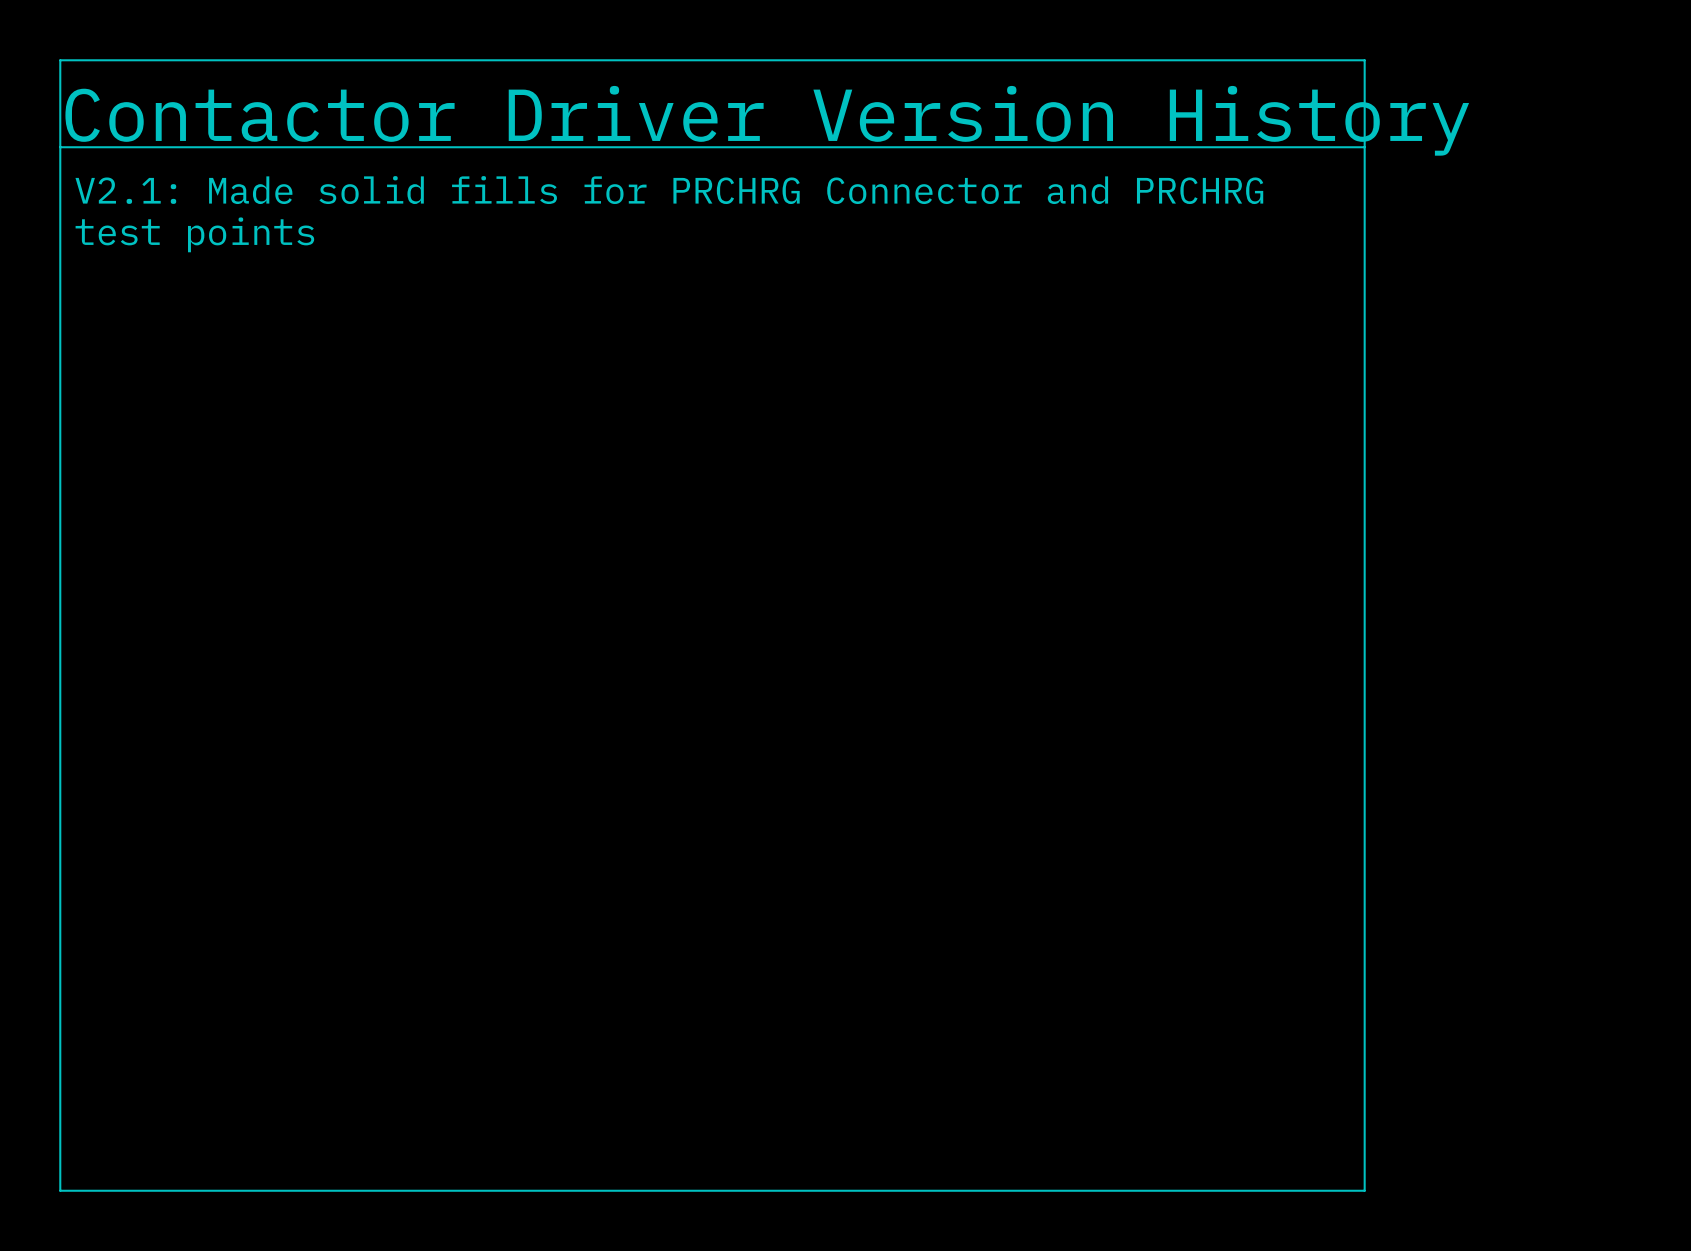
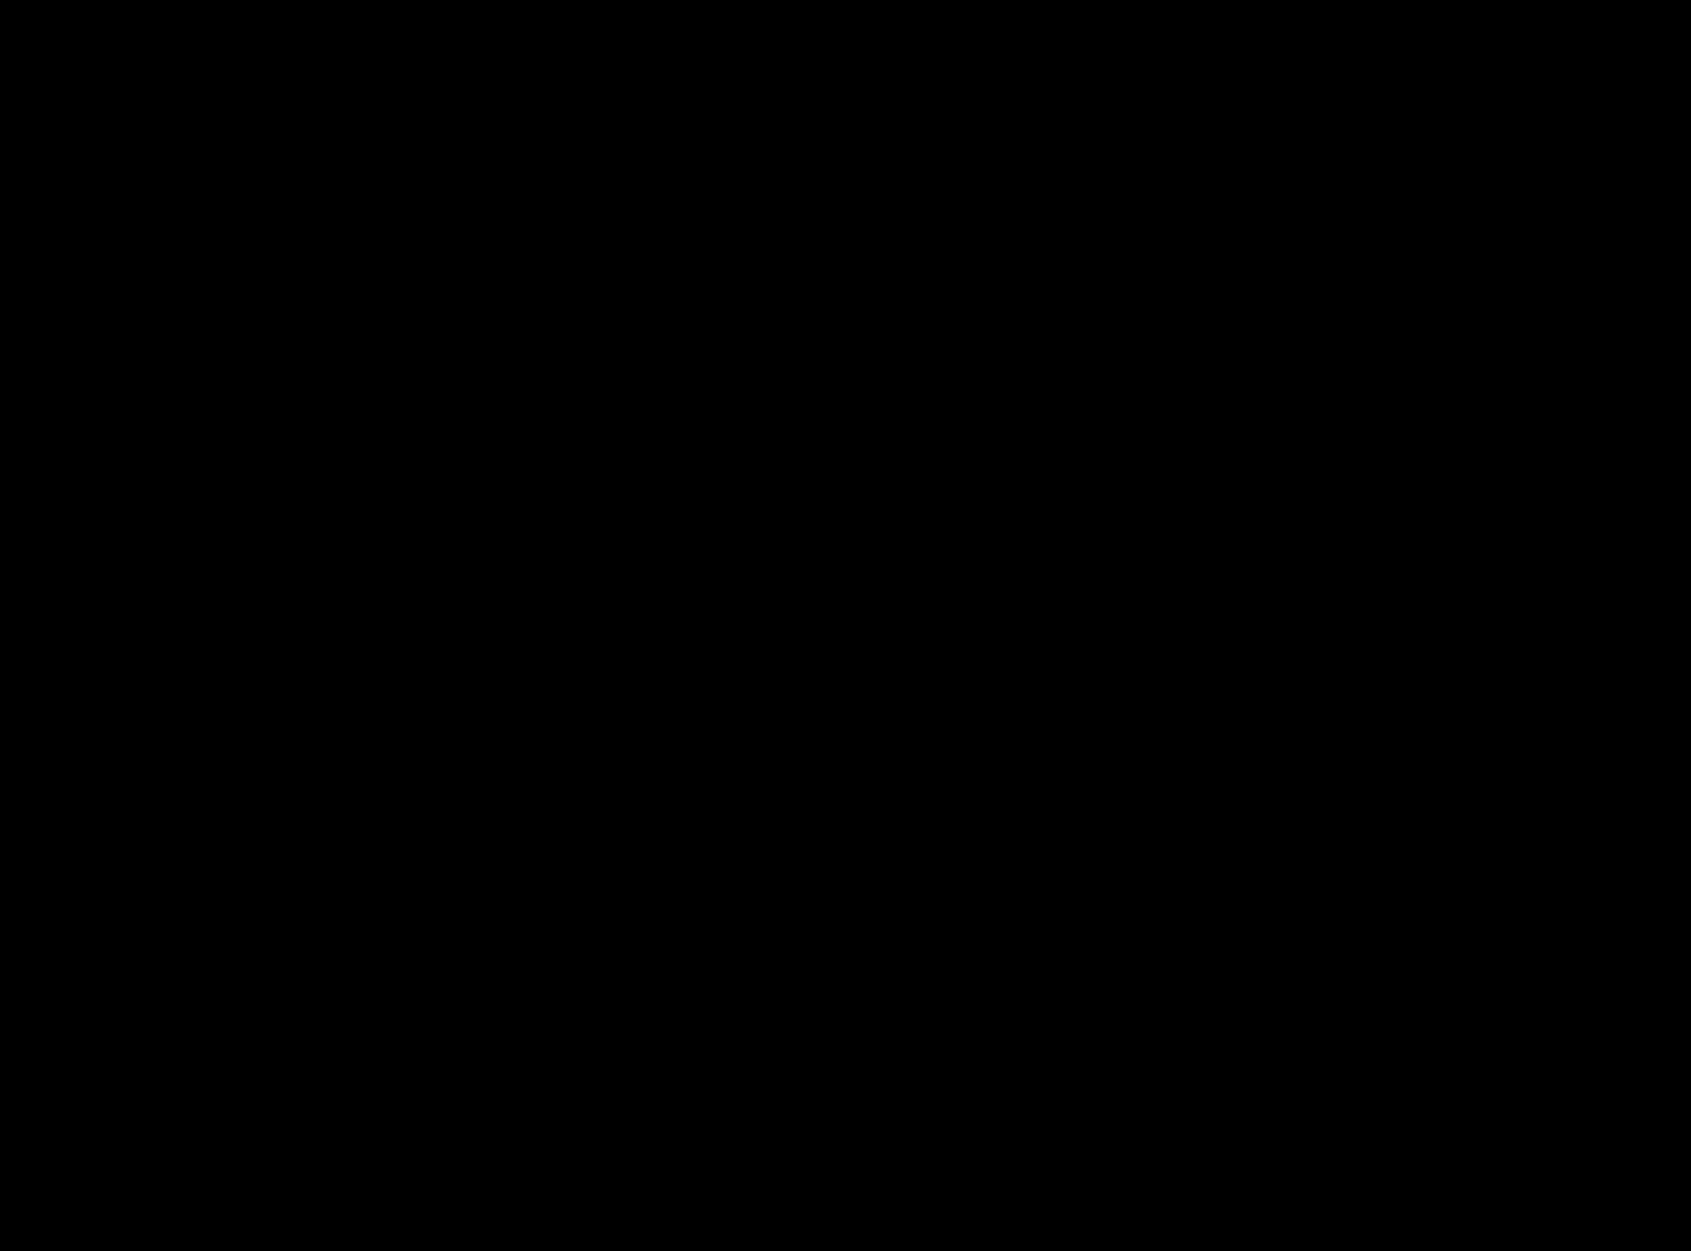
line: (60, 60) (1364, 60) (1364, 1190) (60, 1190) (60, 60) -> none
text: Contactor Driver Version History (767, 120) -> none
line: (60, 147) (1364, 147) -> none
text: V2.1: Made solid fills for PRCHRG Connector and PRCHRG (669, 190) -> none
text: test points (194, 234) -> none

